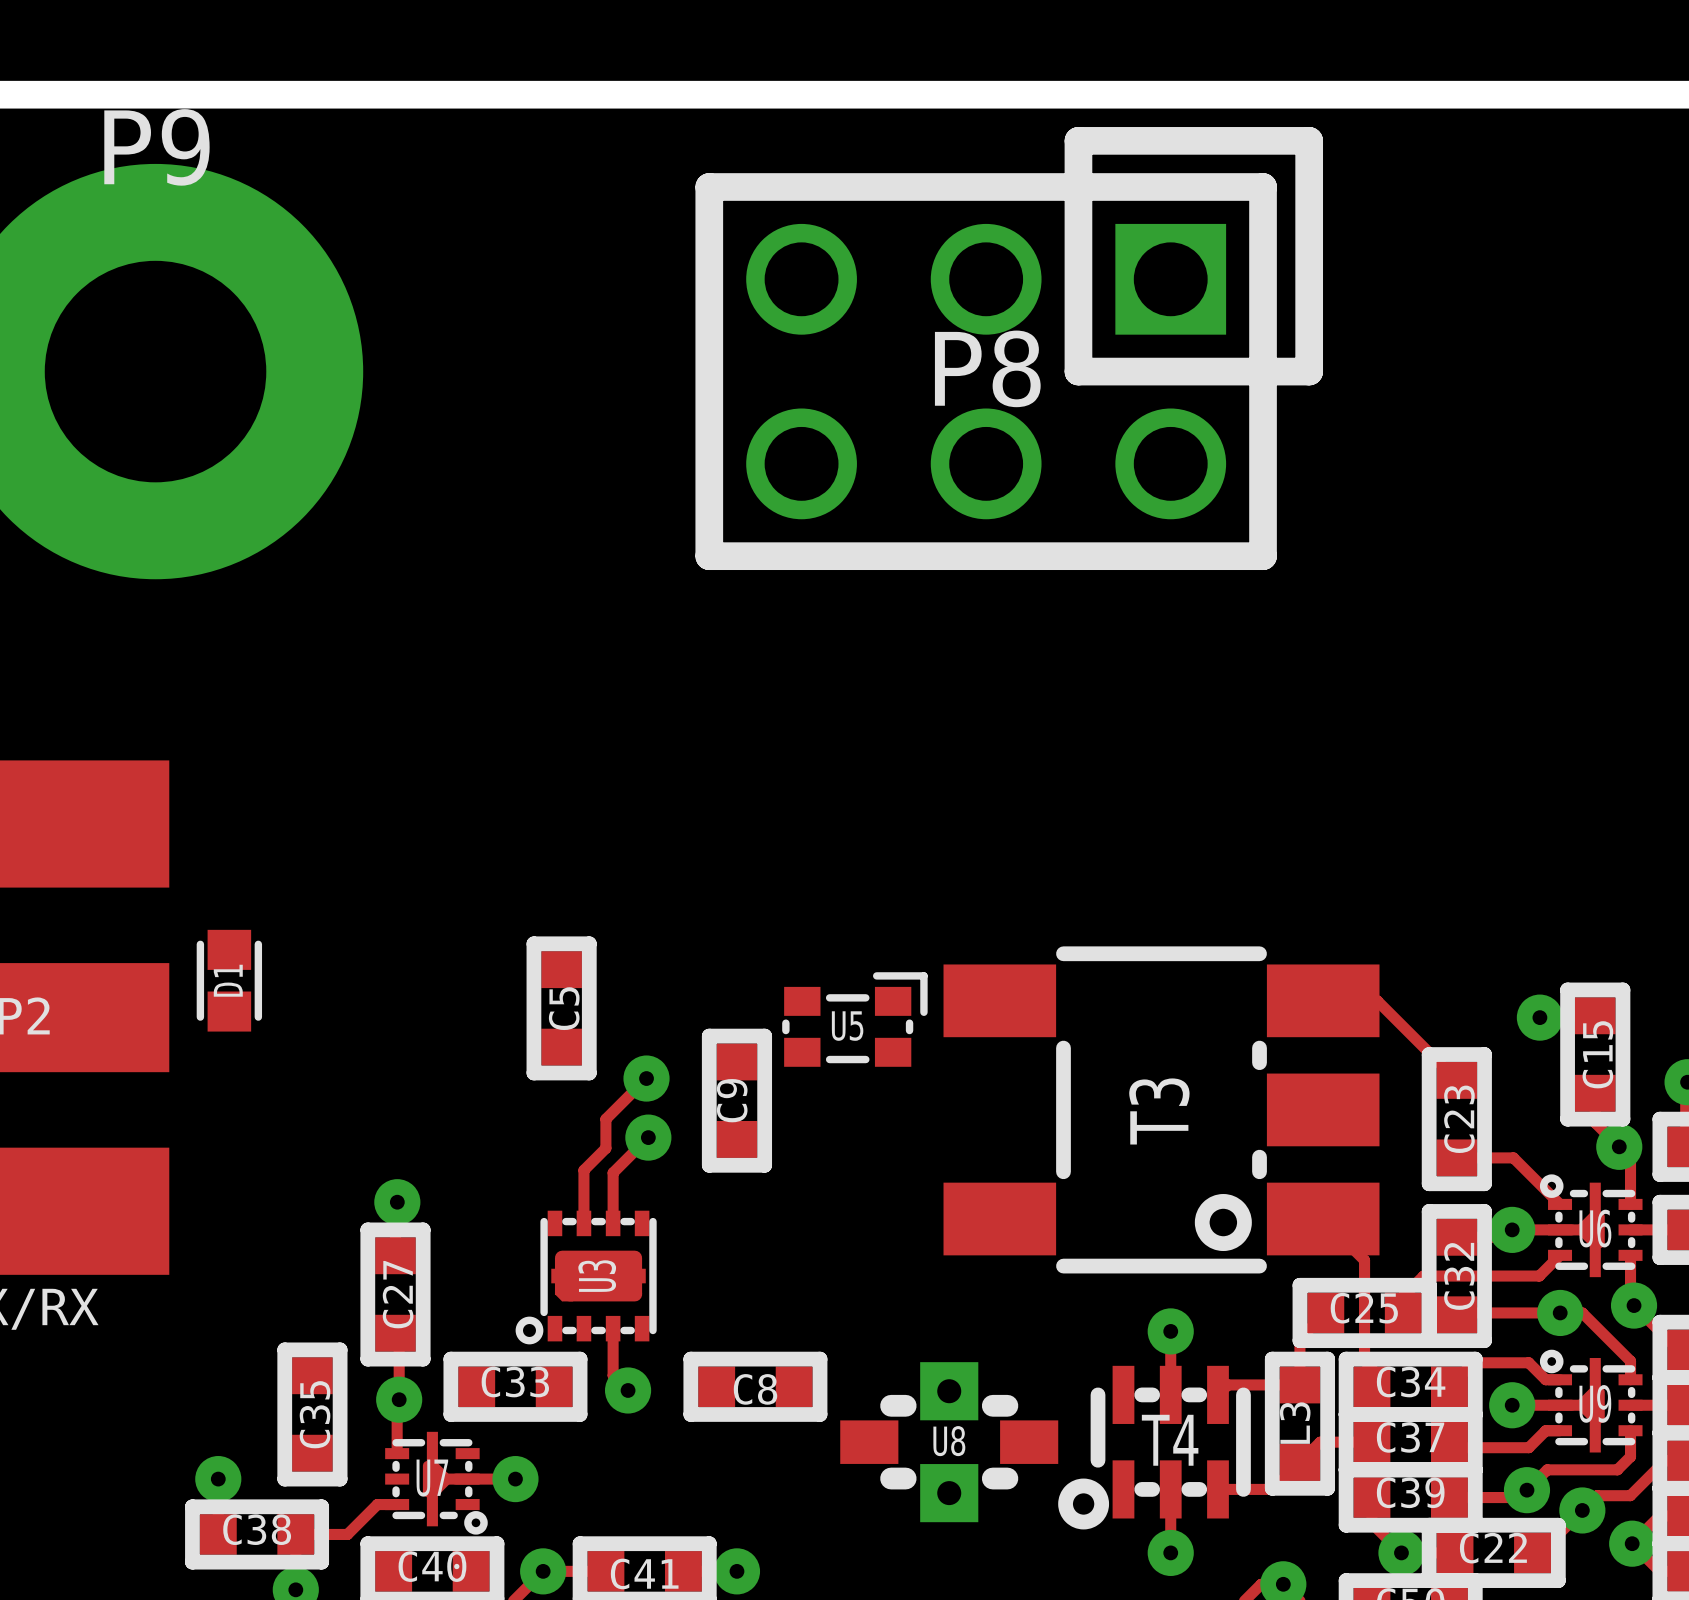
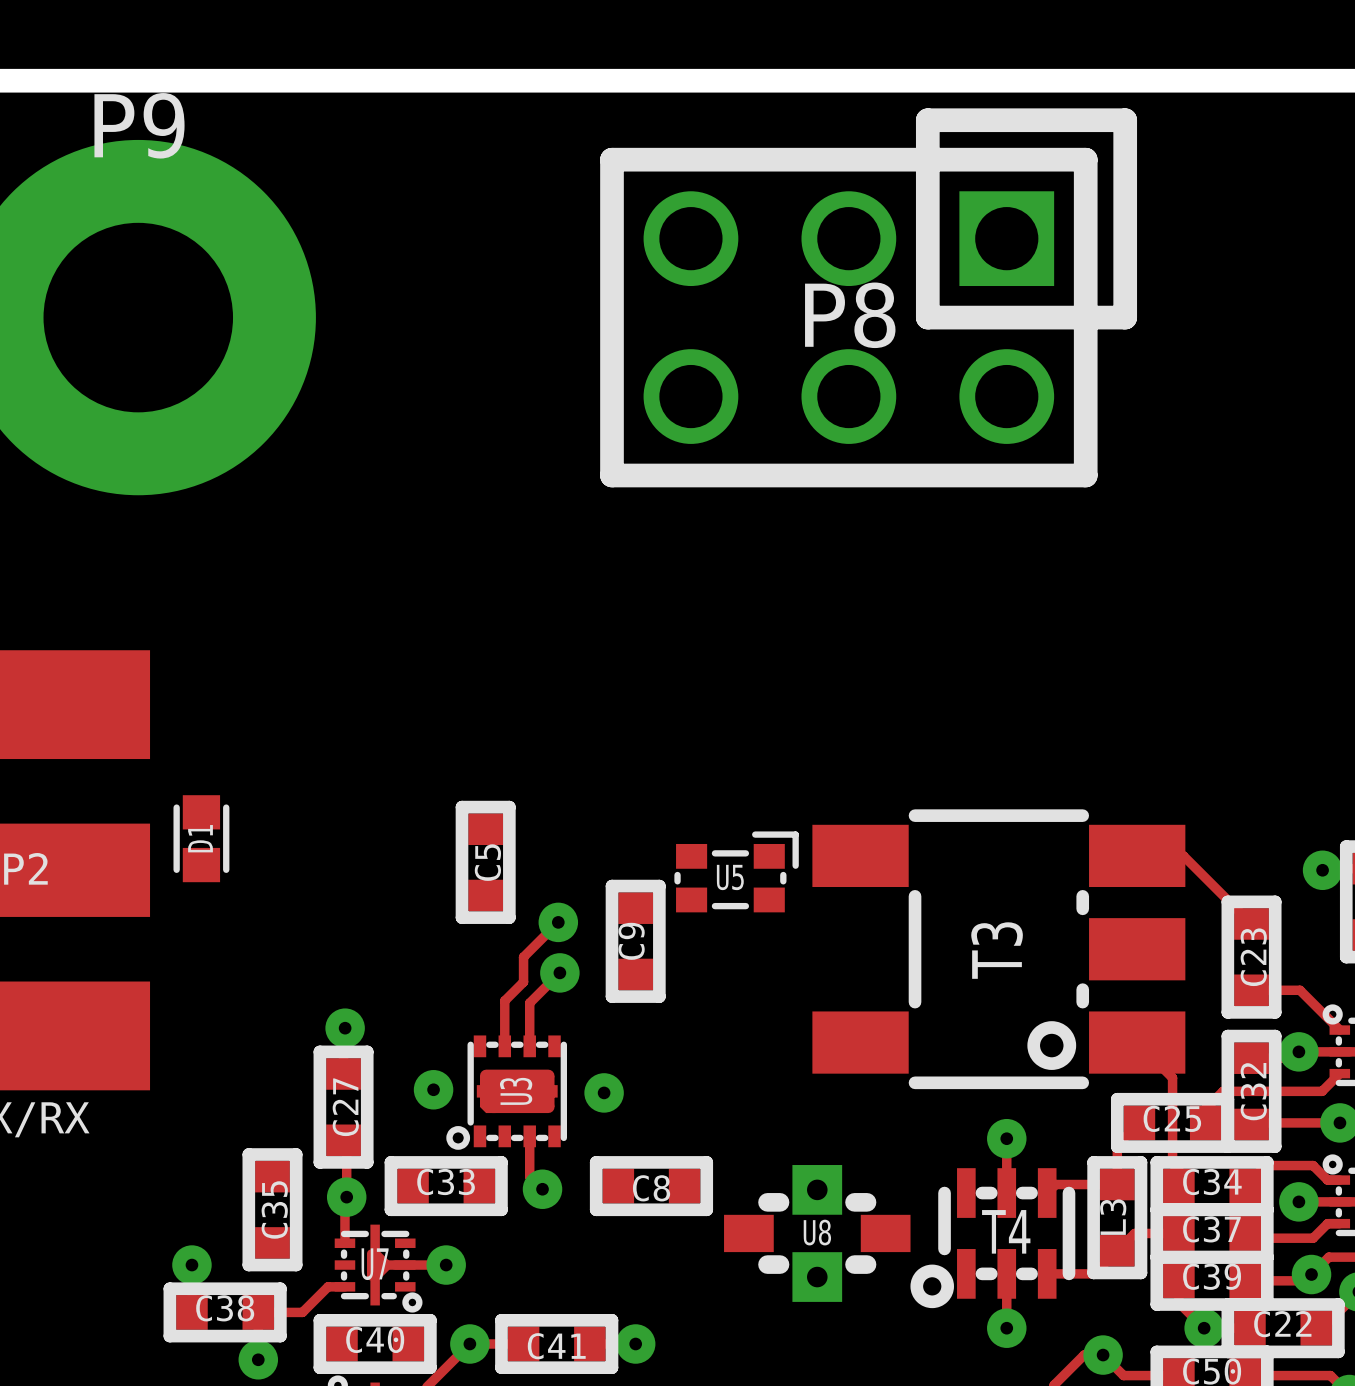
via: none -> (433, 1089)
via: none -> (604, 1092)

